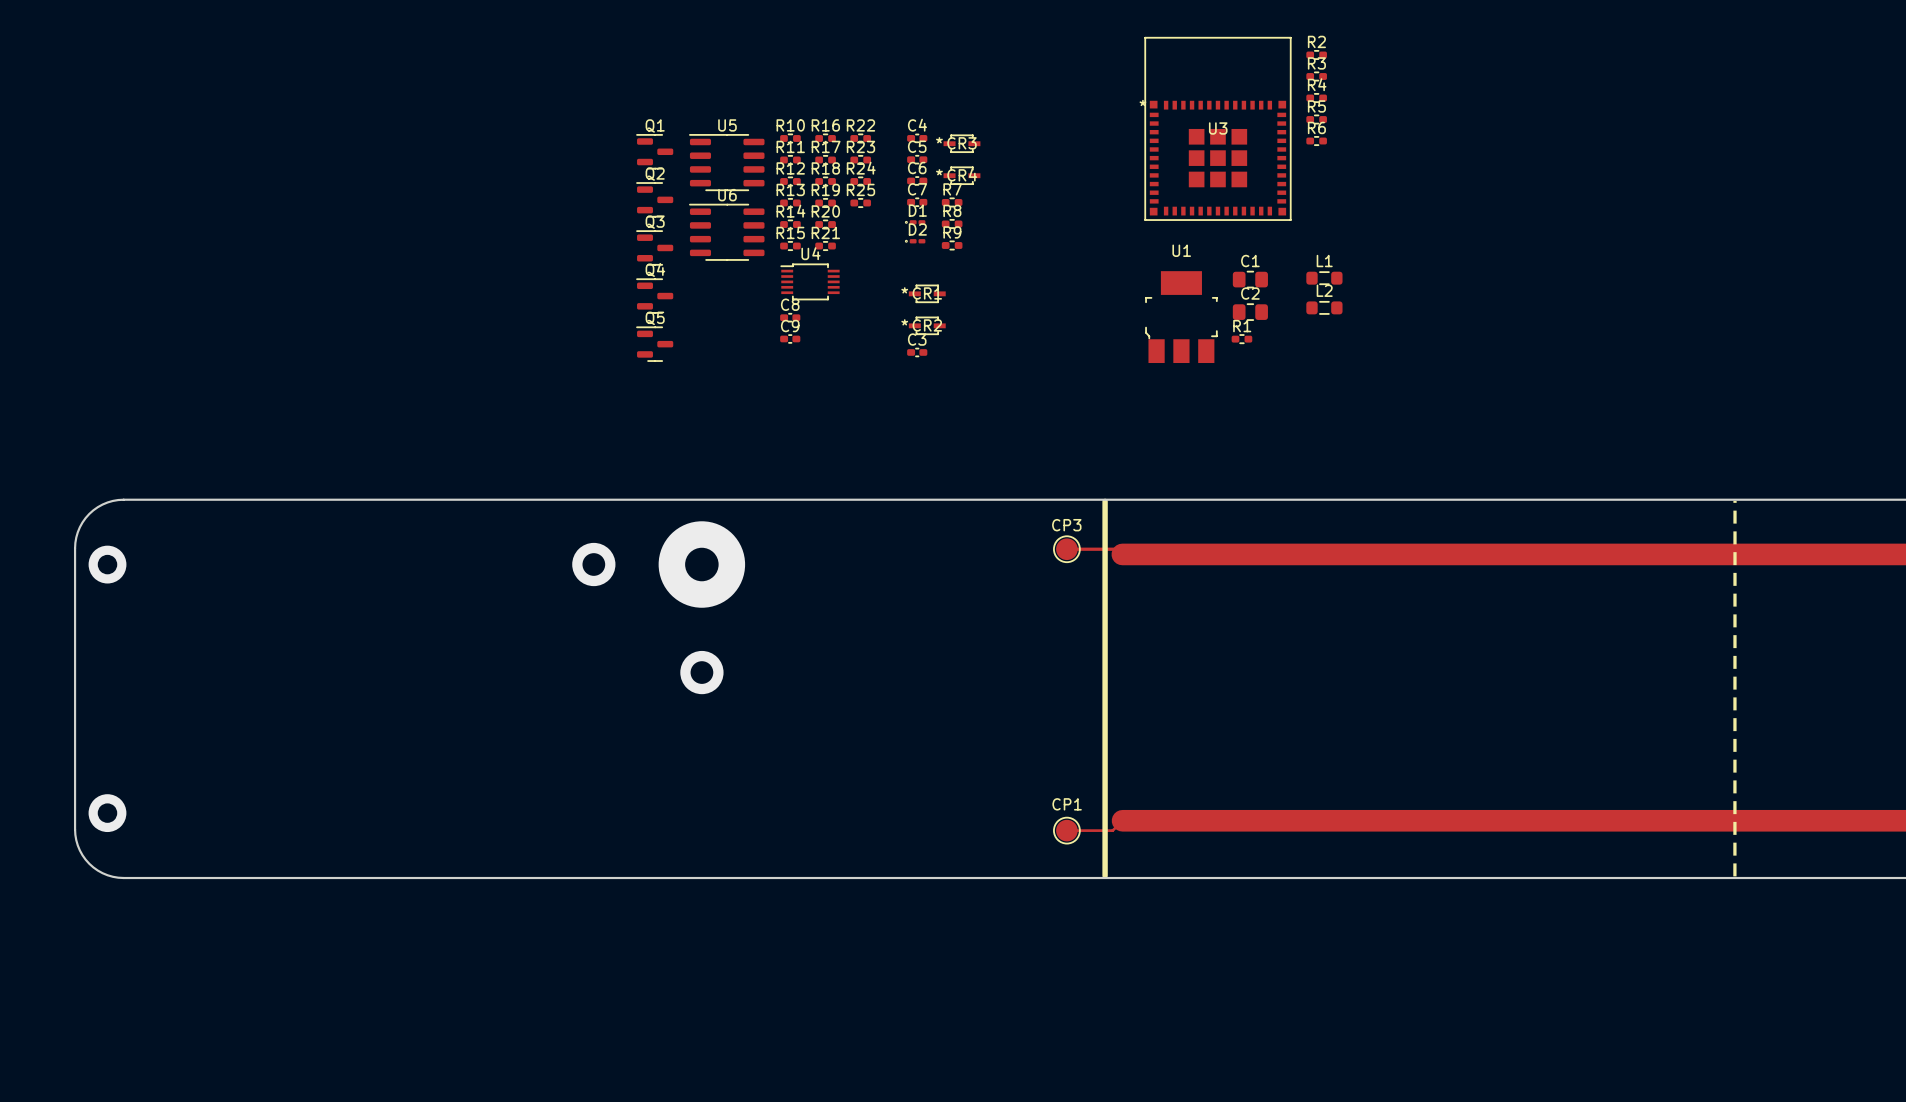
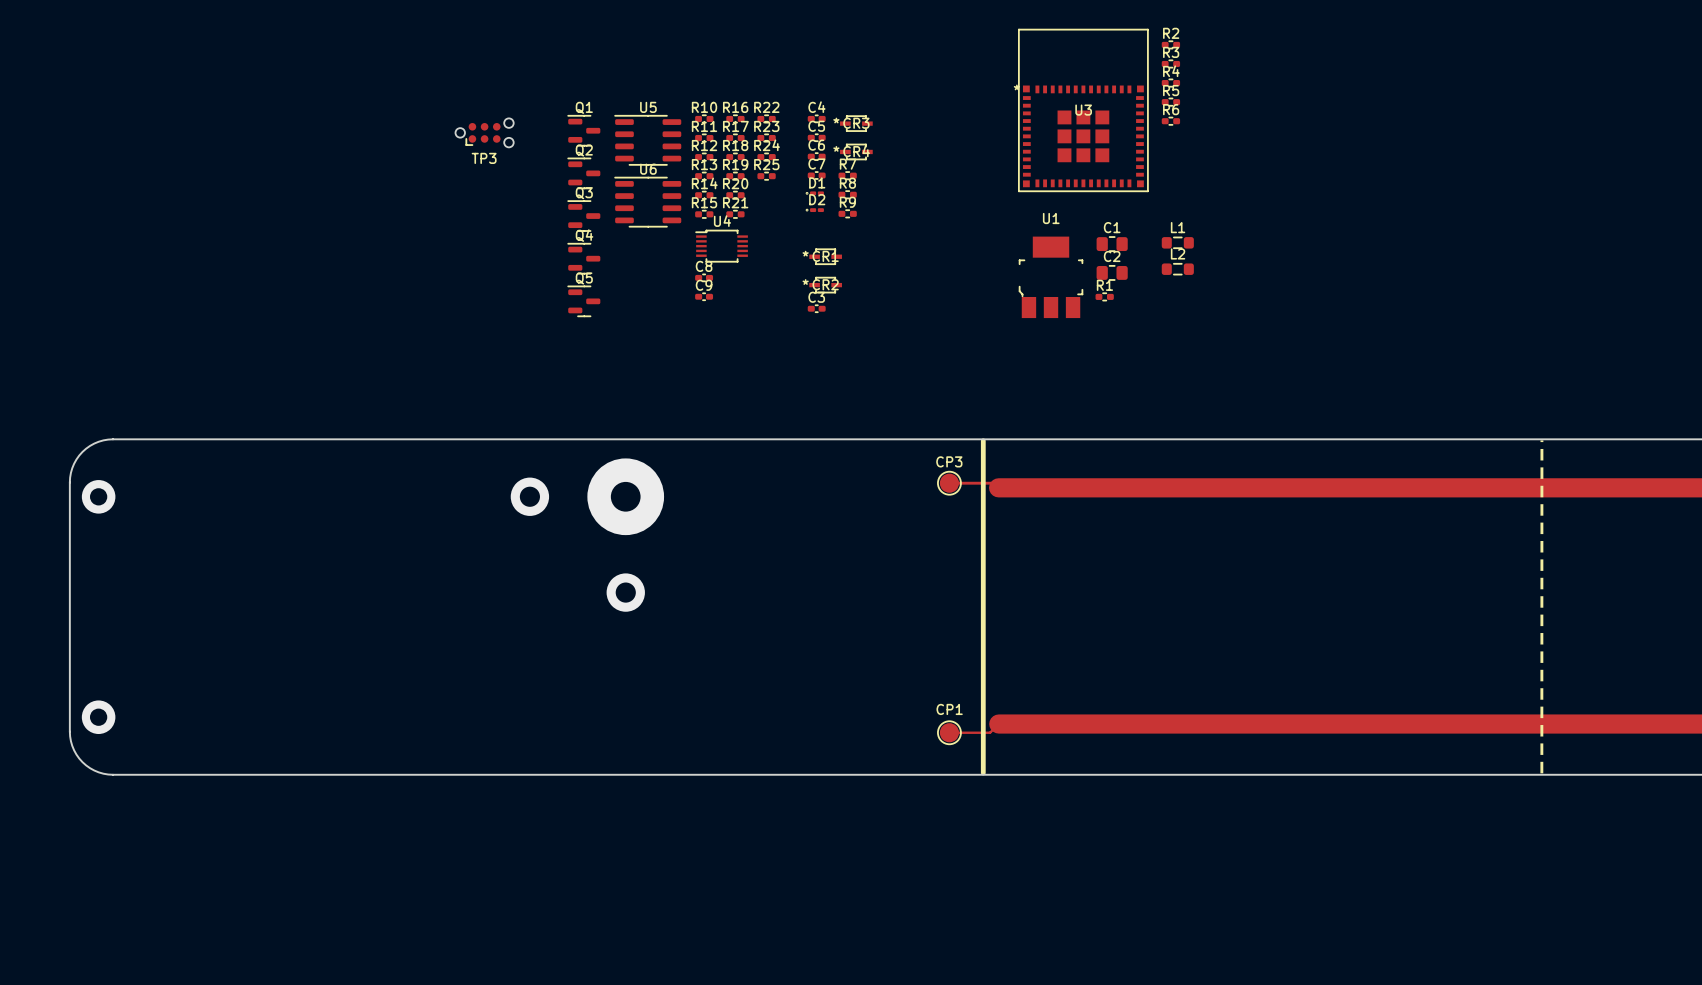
TP3: none -> (484, 132)

